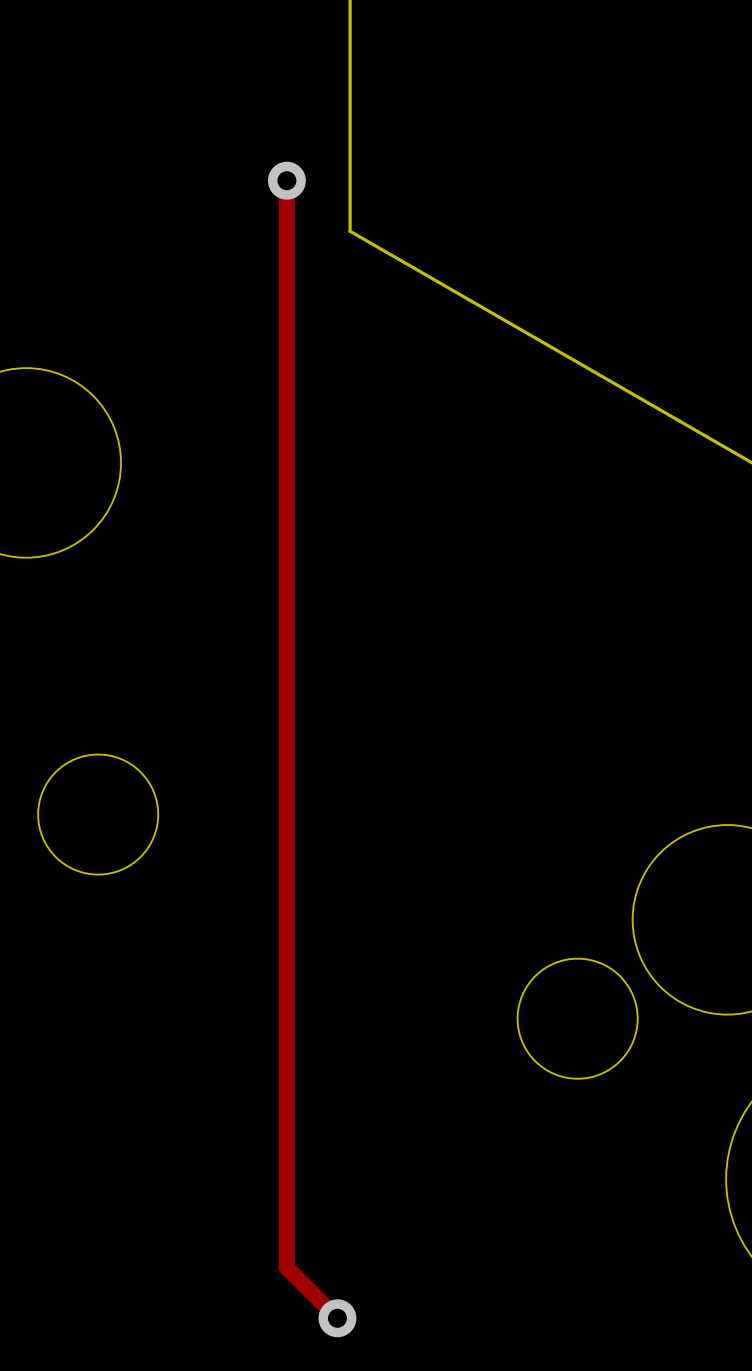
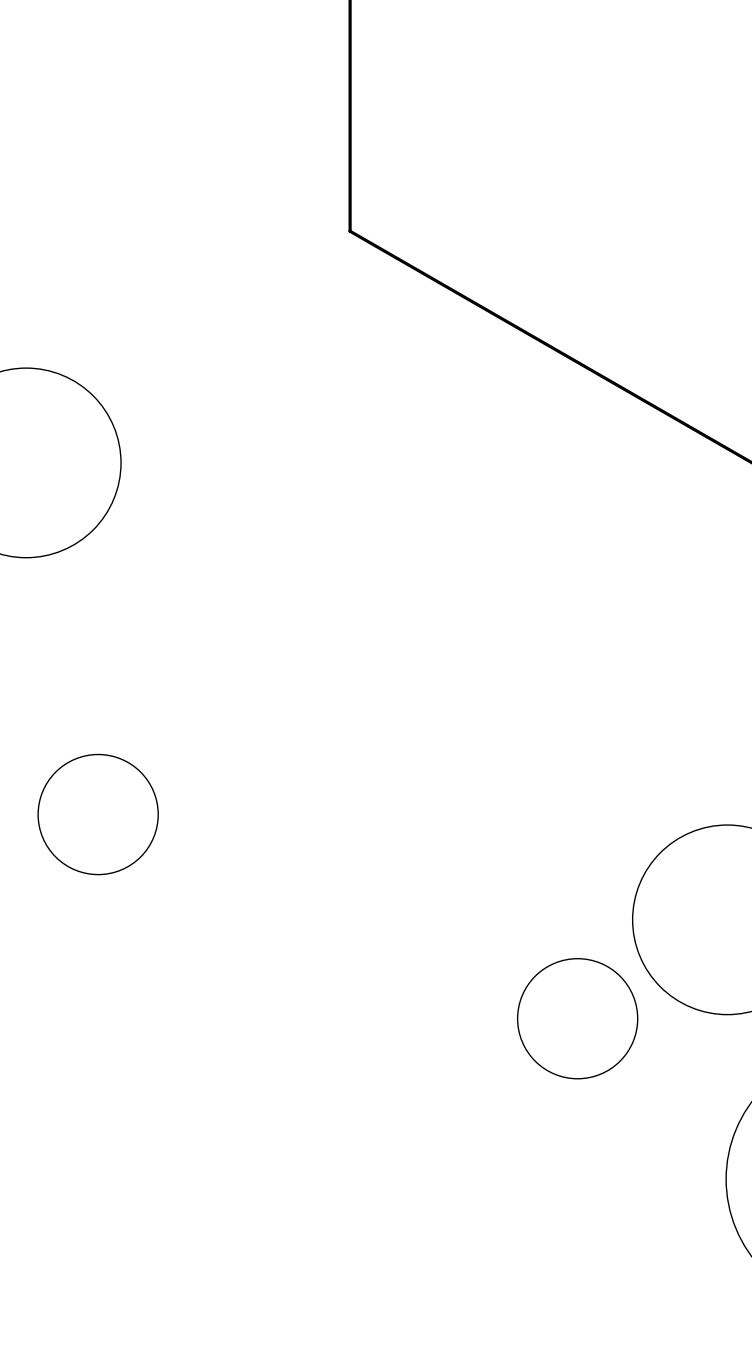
track: (286, 180) (286, 1267) (337, 1318) -> none
via: (286, 180) -> none
via: (337, 1318) -> none

